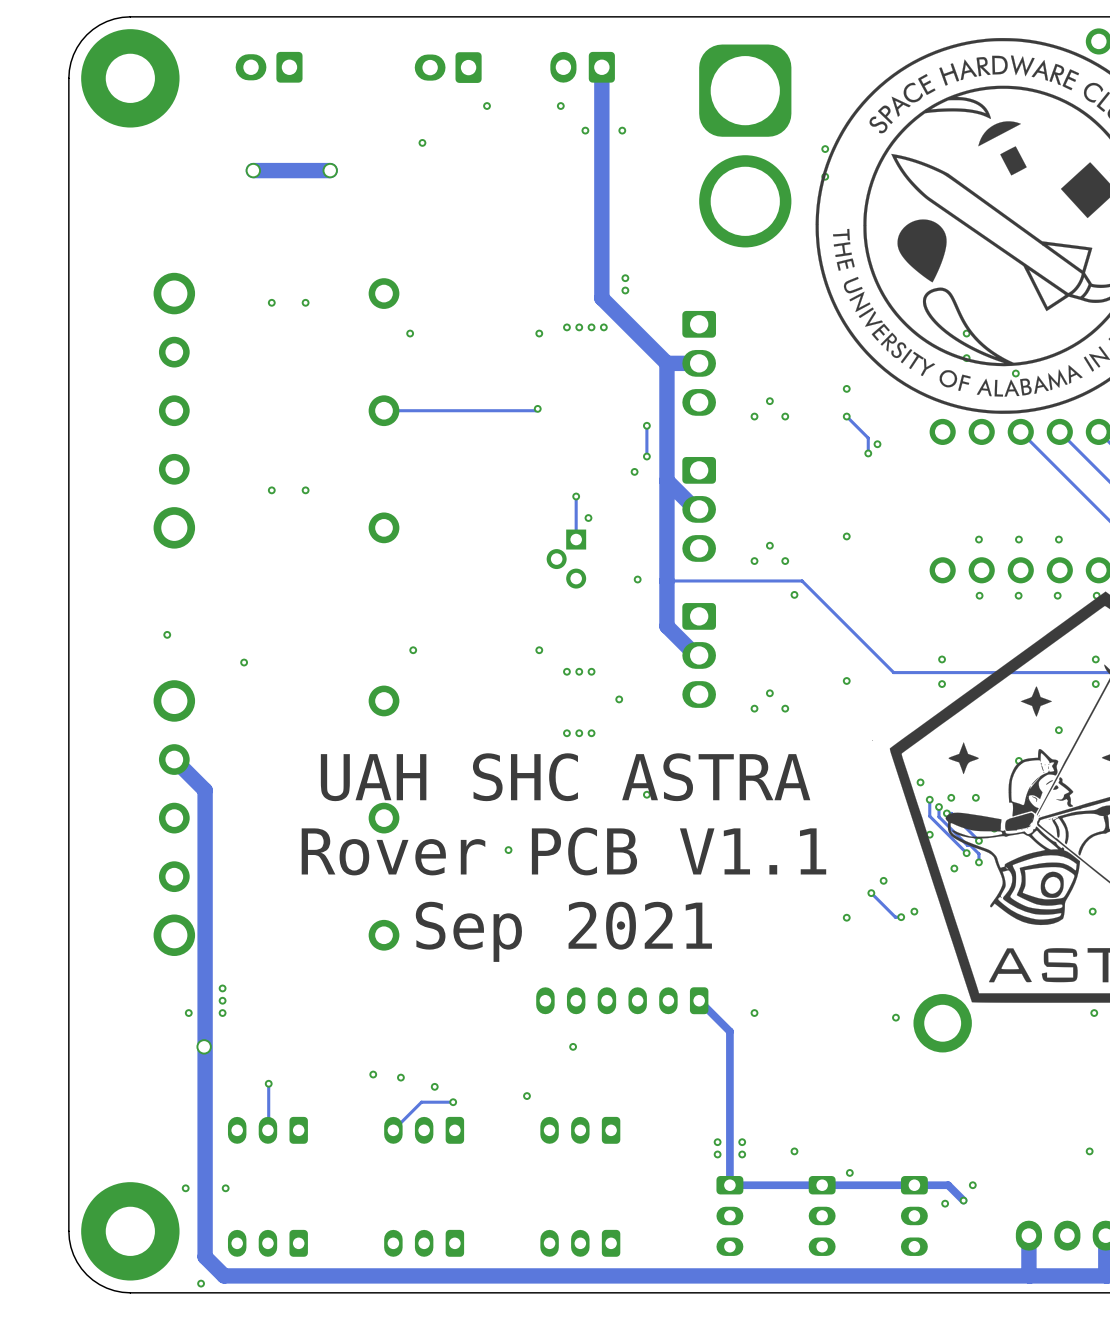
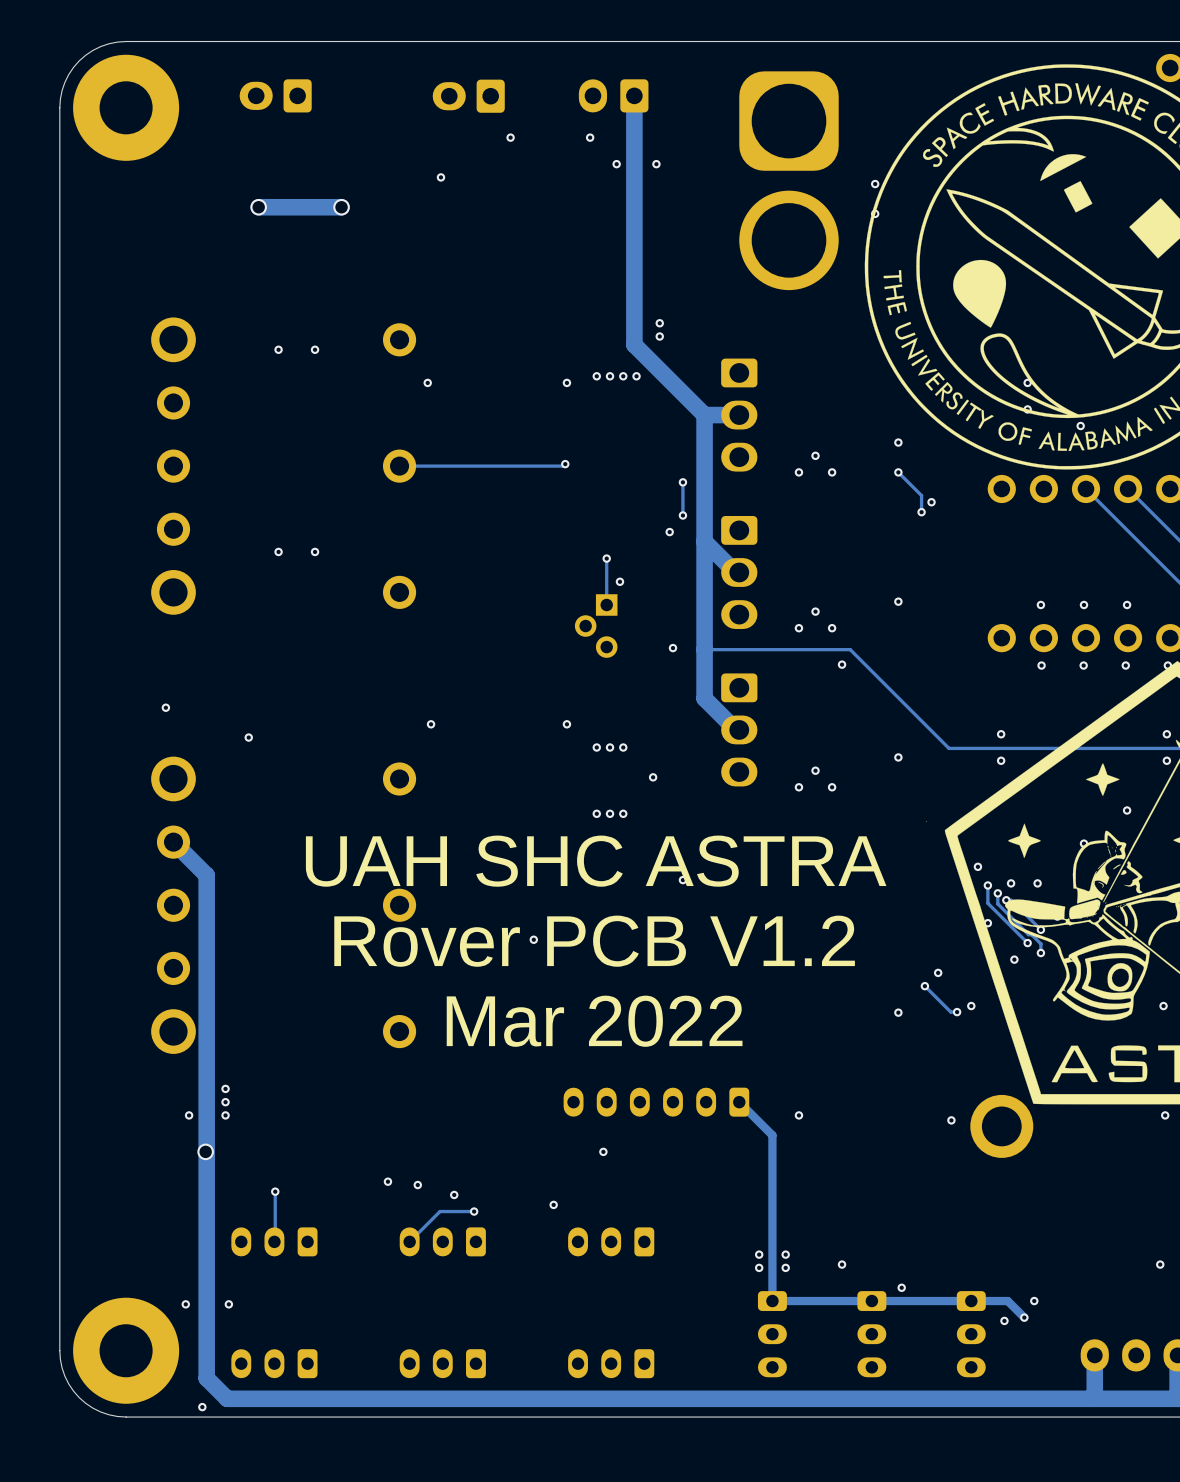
text: Rover PCB V1.1 (563, 851) -> Rover PCB V1.2 (594, 941)
text: Sep 2021 (563, 931) -> Mar 2022 (594, 1021)

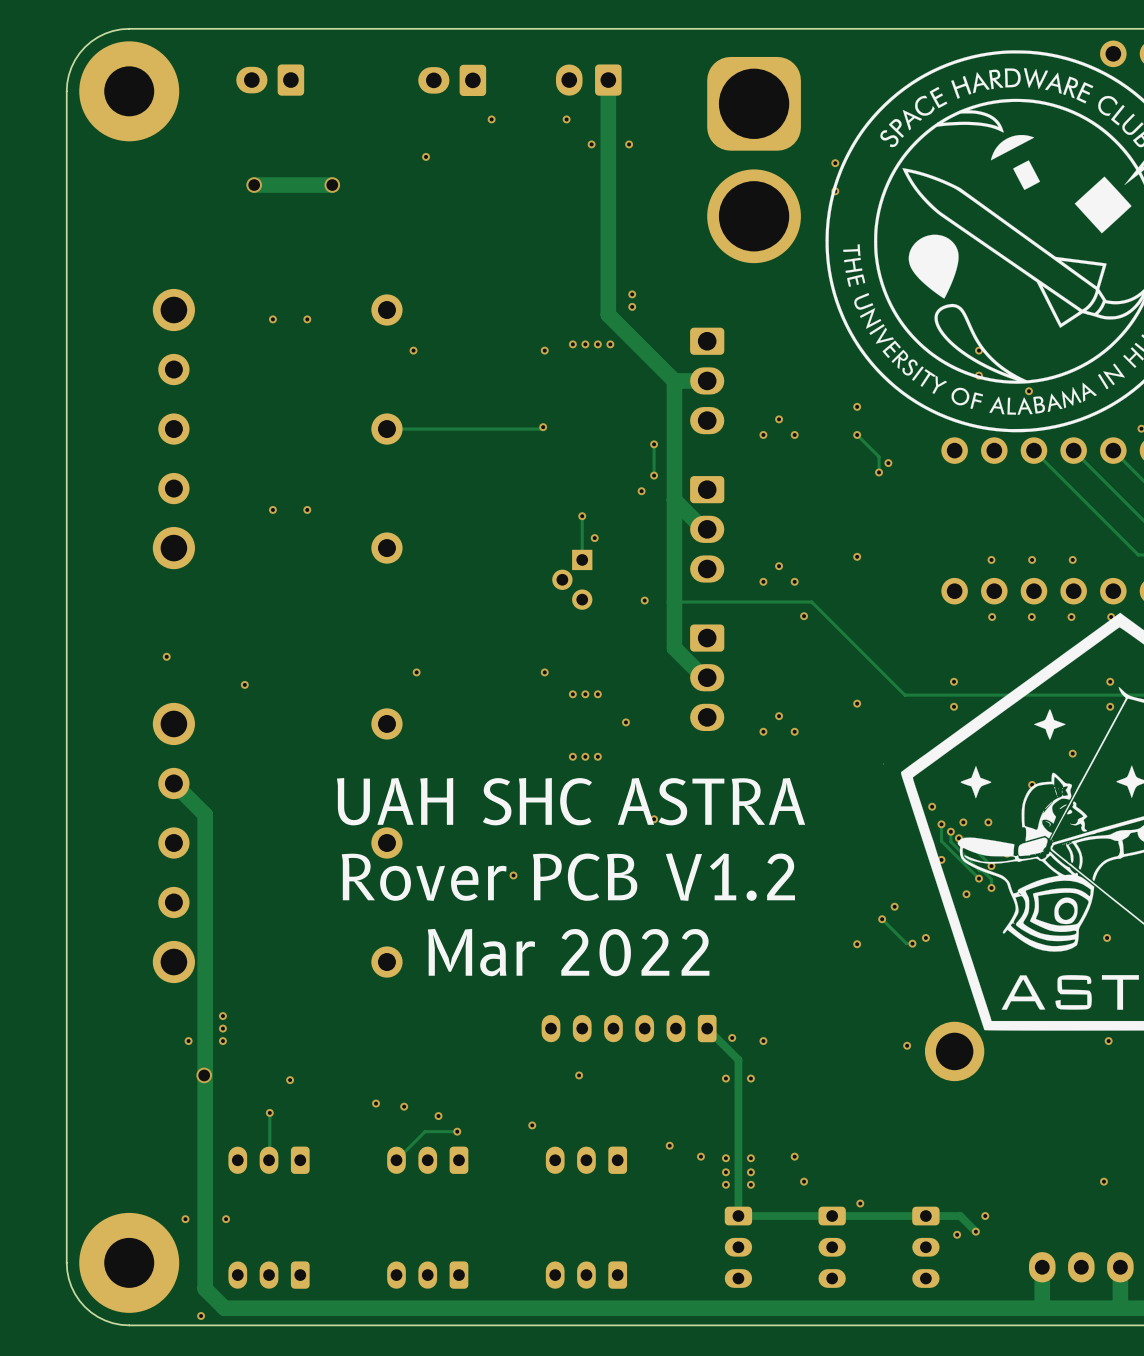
via: none -> (732, 1037)
via: none -> (725, 1078)
via: none -> (750, 1078)
via: none -> (290, 1080)
via: none -> (669, 1145)
via: none -> (700, 1156)
via: none -> (794, 1156)
via: none -> (725, 1158)
via: none -> (750, 1158)

